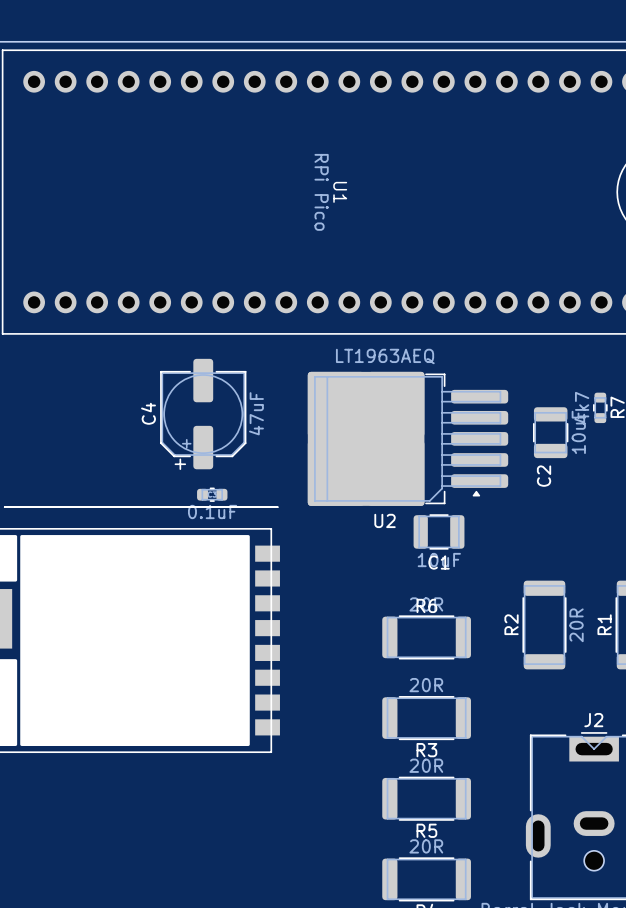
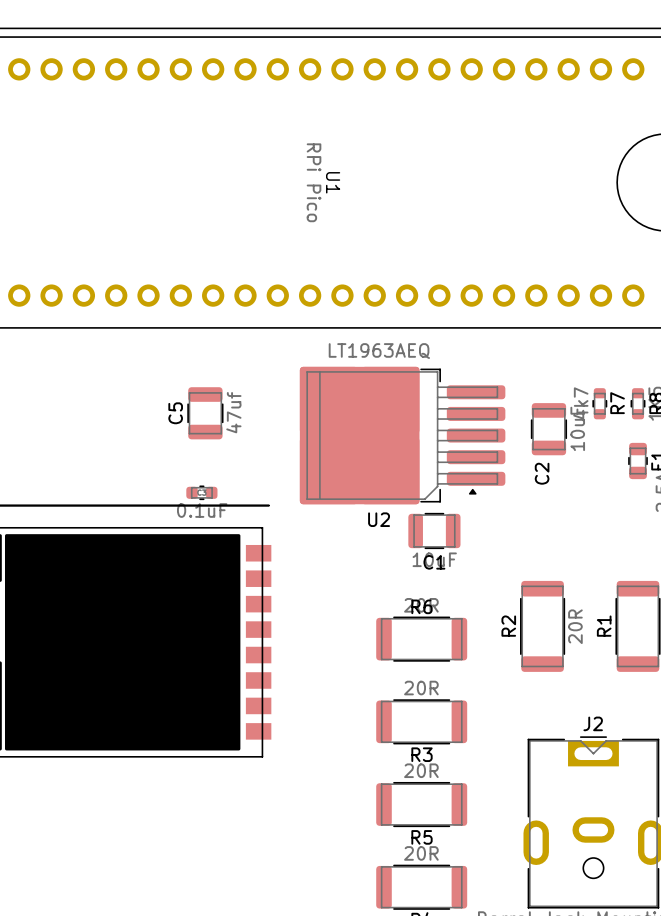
C4: 47uF (203, 414) -> none
C5: none -> 47uf (205, 413)

